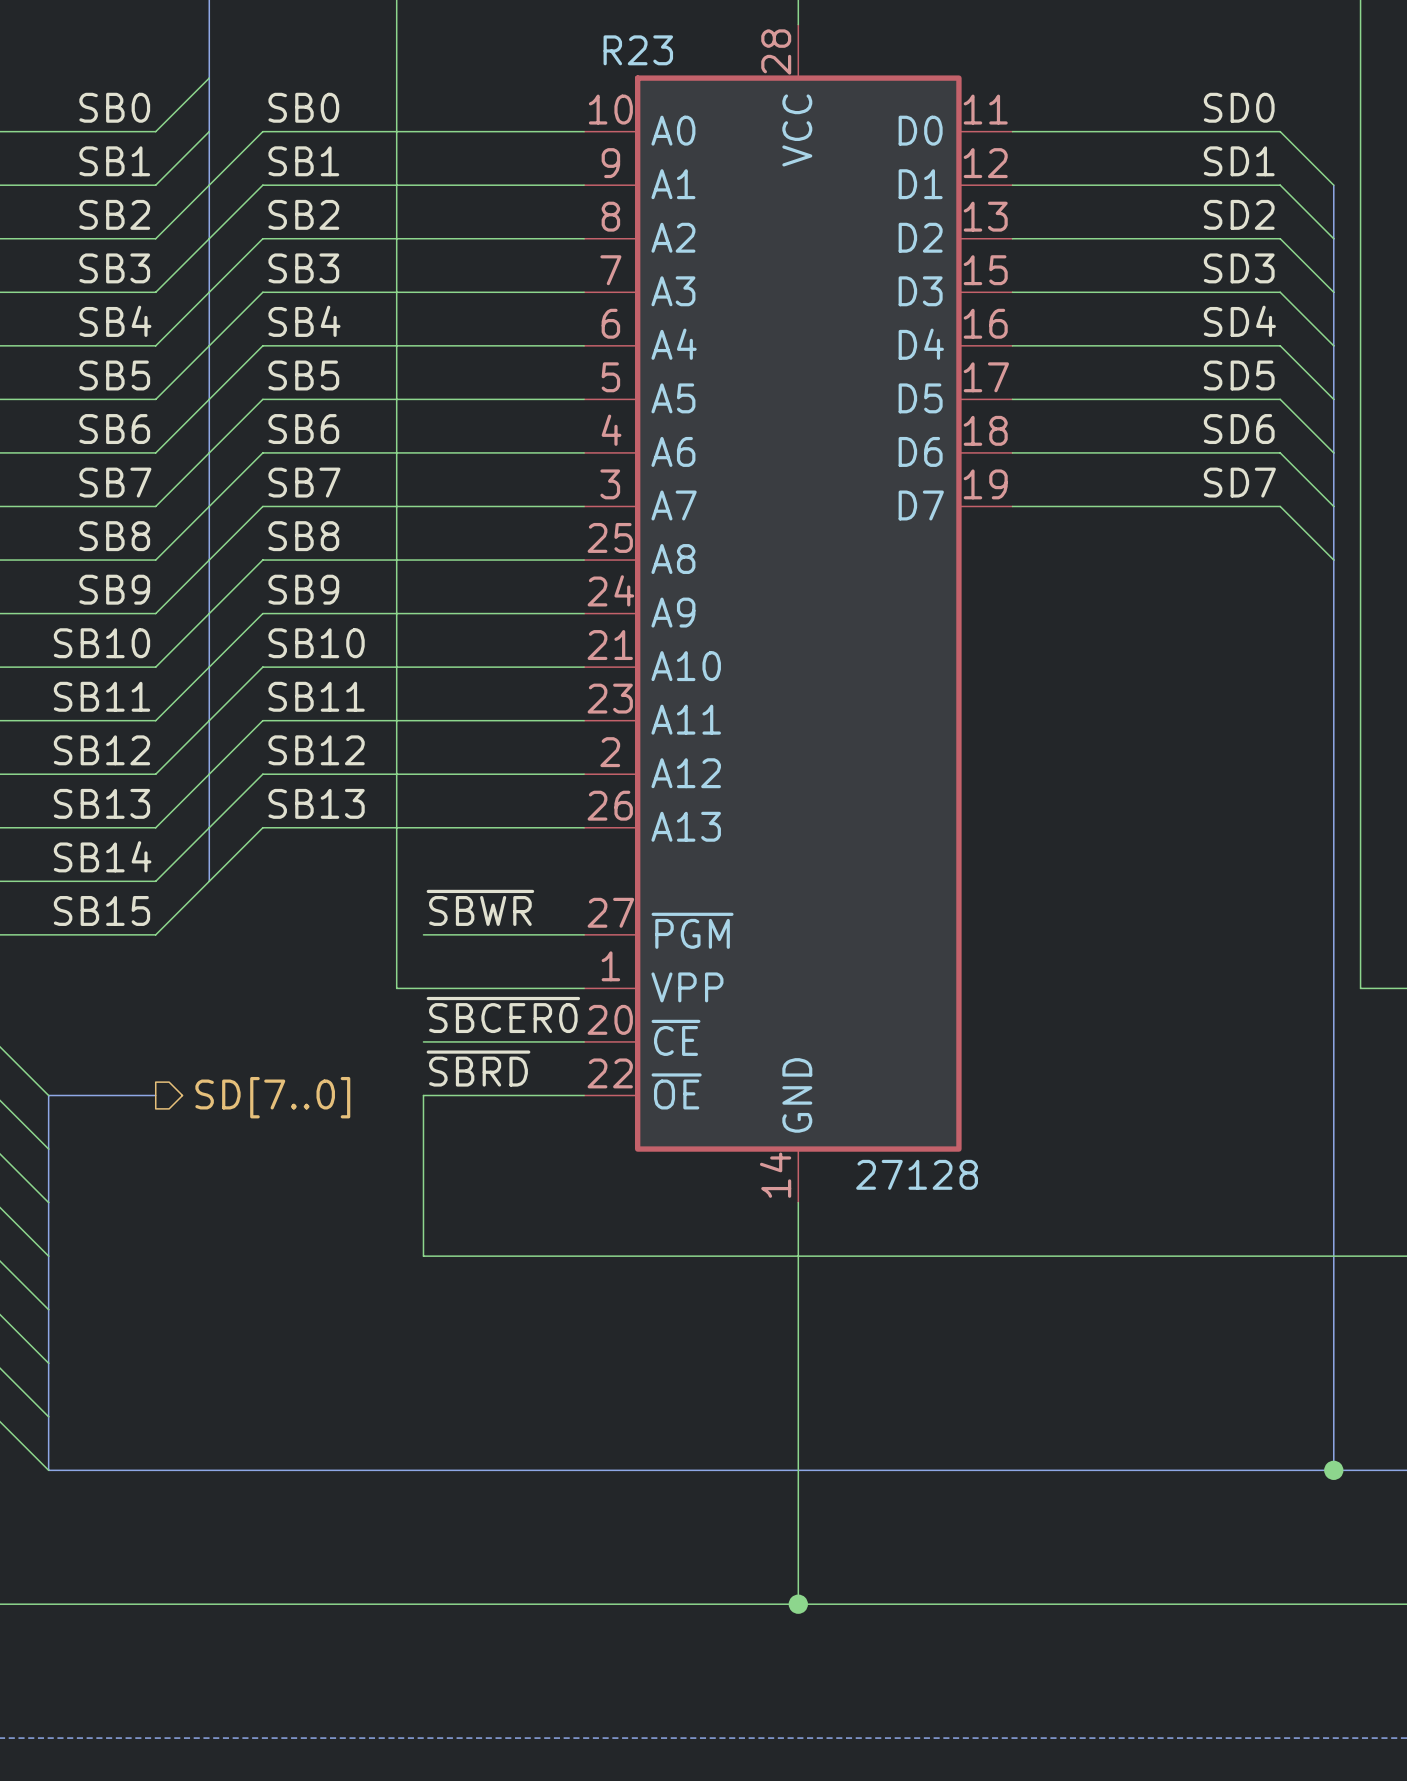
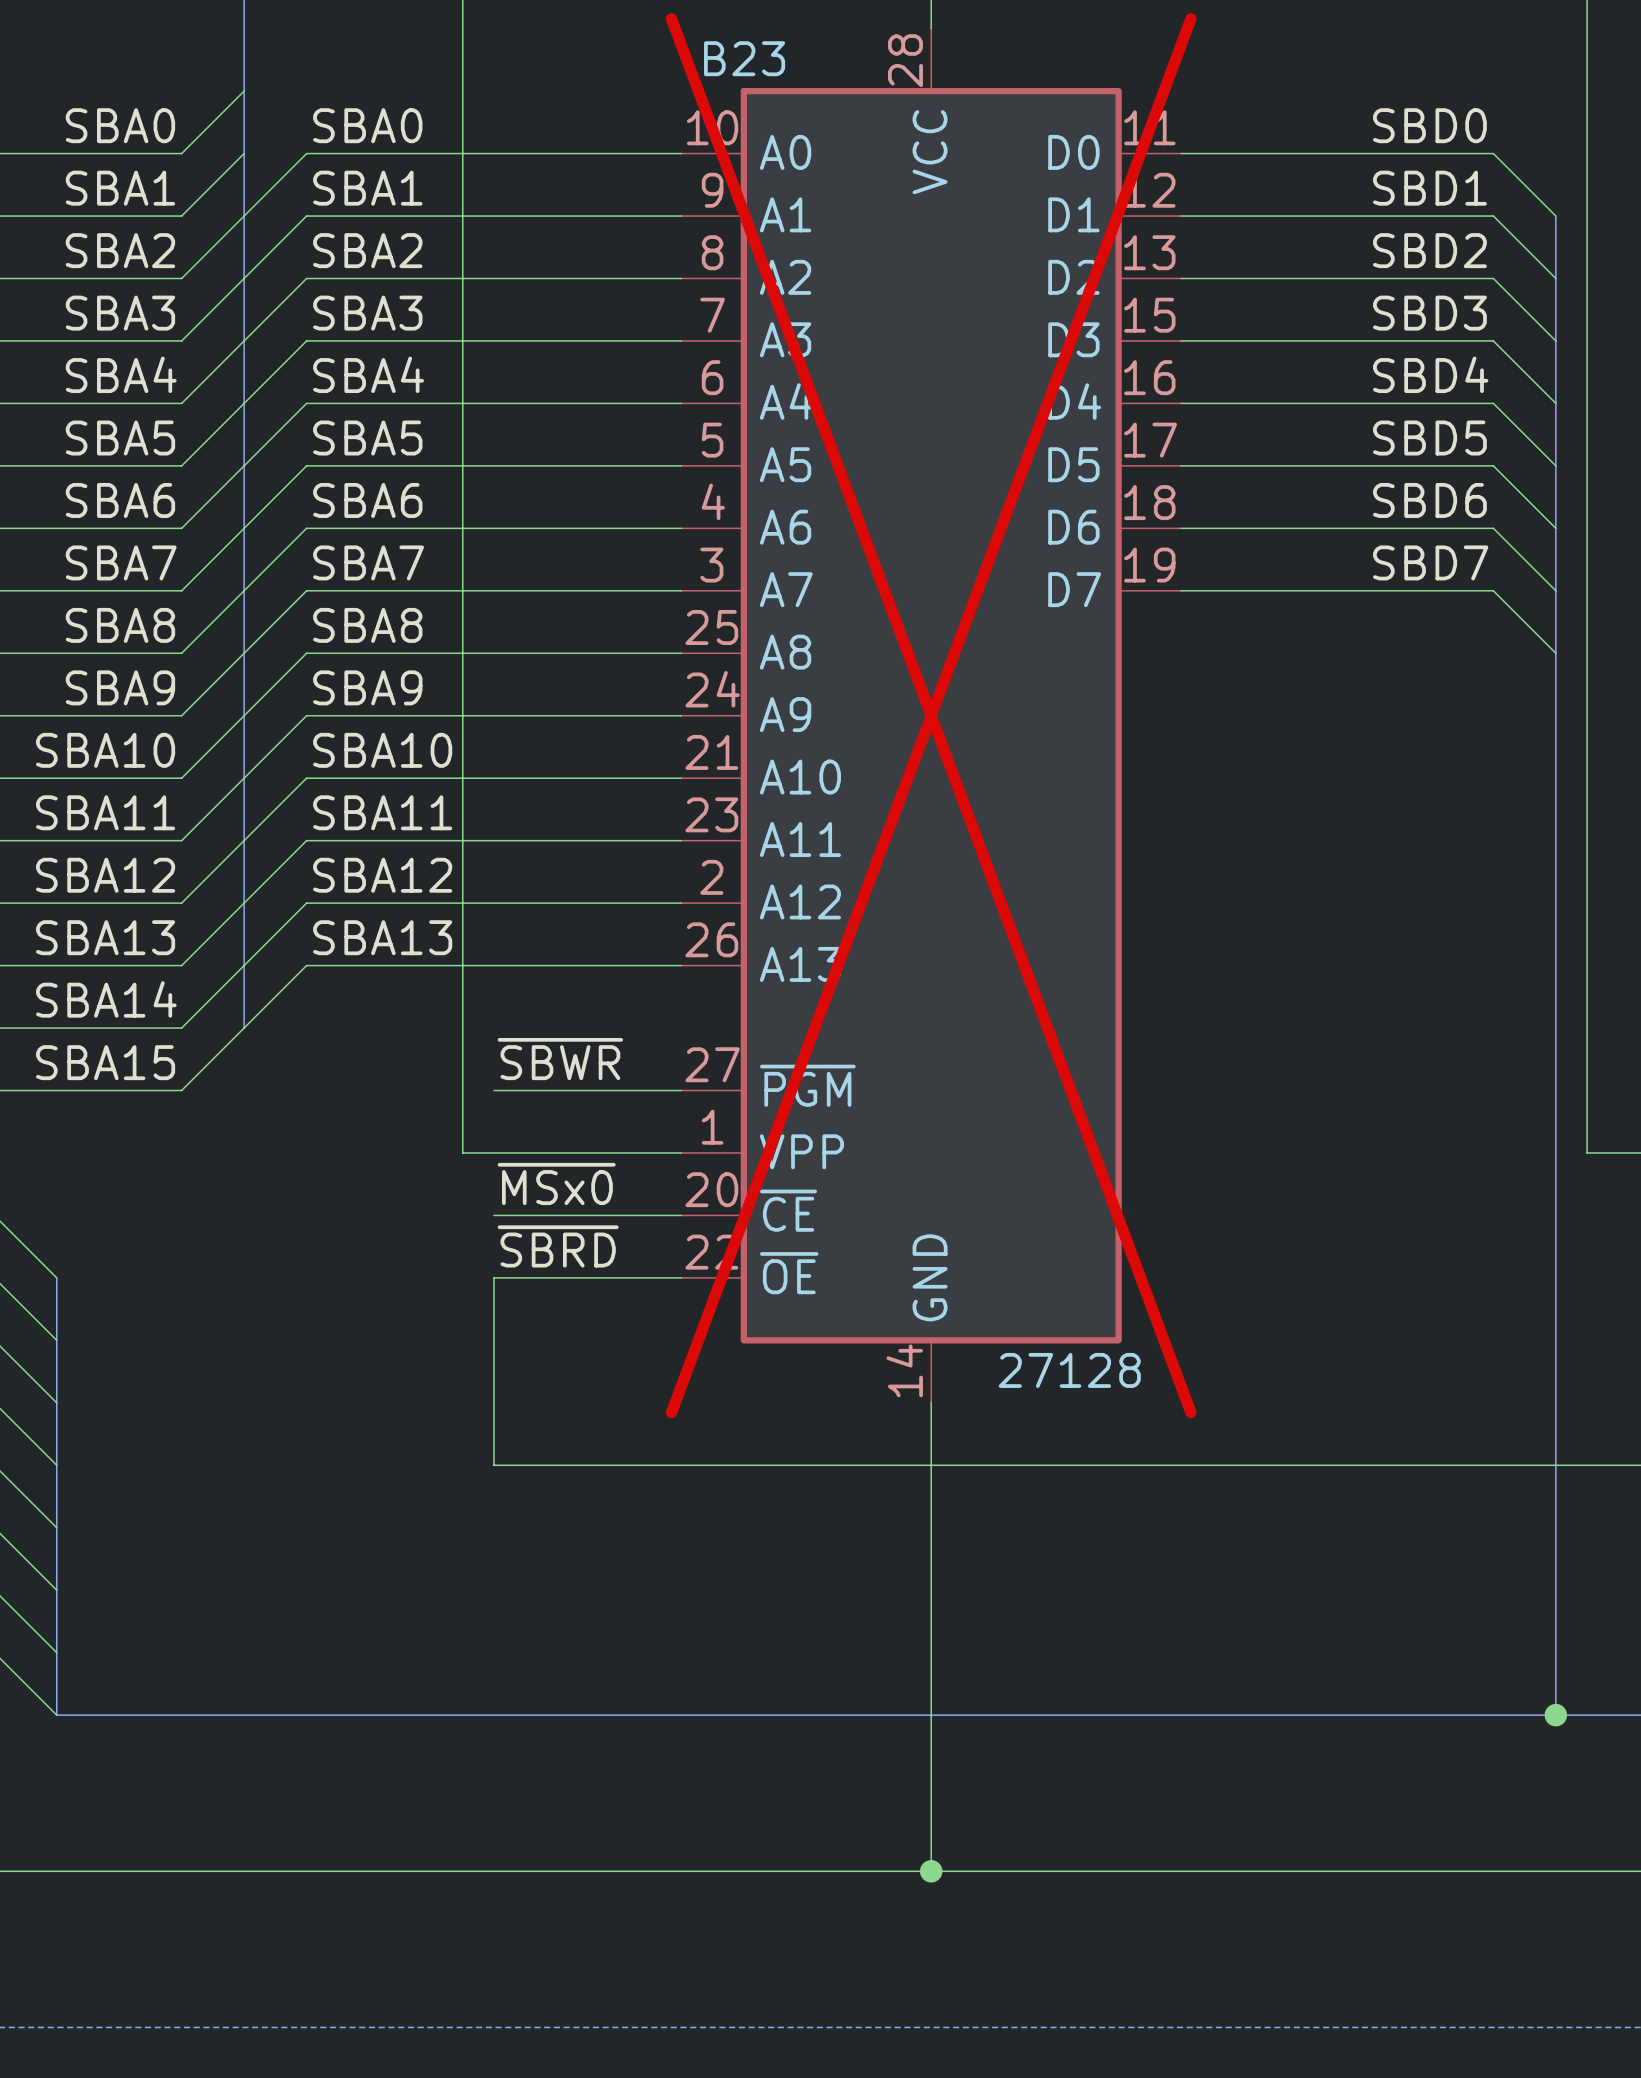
R23 name: R23 (638, 50) -> B23 (744, 58)
label: SB0 (114, 107) -> SBA0 (120, 125)
label: SB0 (303, 107) -> SBA0 (367, 125)
label: SD0 (1239, 107) -> SBD0 (1429, 125)
label: SB1 (114, 161) -> SBA1 (120, 188)
label: SB1 (303, 161) -> SBA1 (367, 188)
label: SD1 (1239, 161) -> SBD1 (1429, 188)
label: SB2 (114, 214) -> SBA2 (120, 250)
label: SB2 (303, 214) -> SBA2 (367, 250)
label: SD2 (1239, 214) -> SBD2 (1429, 250)
label: SB3 (114, 268) -> SBA3 (120, 313)
label: SB3 (303, 268) -> SBA3 (367, 313)
label: SD3 (1239, 268) -> SBD3 (1429, 313)
label: SB4 (115, 321) -> SBA4 (121, 374)
label: SB4 (304, 321) -> SBA4 (368, 374)
label: SD4 (1239, 321) -> SBD4 (1430, 374)
label: SB5 (114, 375) -> SBA5 (120, 438)
label: SB5 (303, 375) -> SBA5 (367, 438)
label: SD5 (1239, 375) -> SBD5 (1429, 438)
label: SB6 (114, 429) -> SBA6 (120, 500)
label: SB6 (303, 429) -> SBA6 (367, 500)
label: SD6 (1239, 429) -> SBD6 (1429, 500)
label: SB7 (115, 482) -> SBA7 (121, 562)
label: SB7 (304, 482) -> SBA7 (368, 562)
label: SD7 (1239, 482) -> SBD7 (1430, 562)
label: SB8 (114, 536) -> SBA8 (120, 625)
label: SB8 (303, 536) -> SBA8 (367, 625)
label: SB9 (114, 589) -> SBA9 (120, 687)
label: SB9 (303, 589) -> SBA9 (367, 687)
R23 do-not-place cross: none -> (931, 715)
label: SB10 (101, 643) -> SBA10 (105, 750)
label: SB10 (316, 643) -> SBA10 (382, 750)
label: SB11 (101, 696) -> SBA11 (105, 812)
label: SB11 (316, 696) -> SBA11 (382, 812)
label: SB12 (101, 750) -> SBA12 (105, 875)
label: SB12 (316, 750) -> SBA12 (382, 875)
label: SB13 (101, 803) -> SBA13 (105, 937)
label: SB13 (316, 803) -> SBA13 (382, 937)
label: SB14 (102, 856) -> SBA14 (106, 999)
label: SB15 (101, 910) -> SBA15 (105, 1062)
label: ~{SBCER0} (503, 1014) -> ~{MSx0} (556, 1183)
bus: (48, 1095) (155, 1095) -> none
hierarchical label: SD[7..0] (272, 1097) -> none

